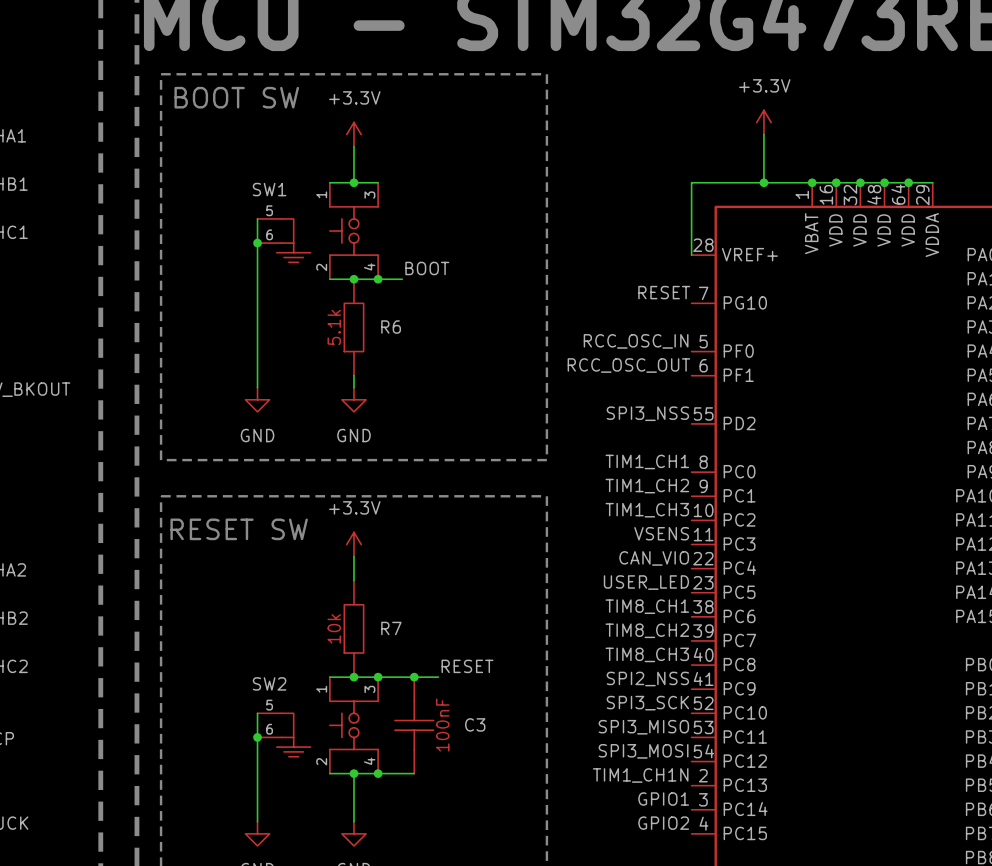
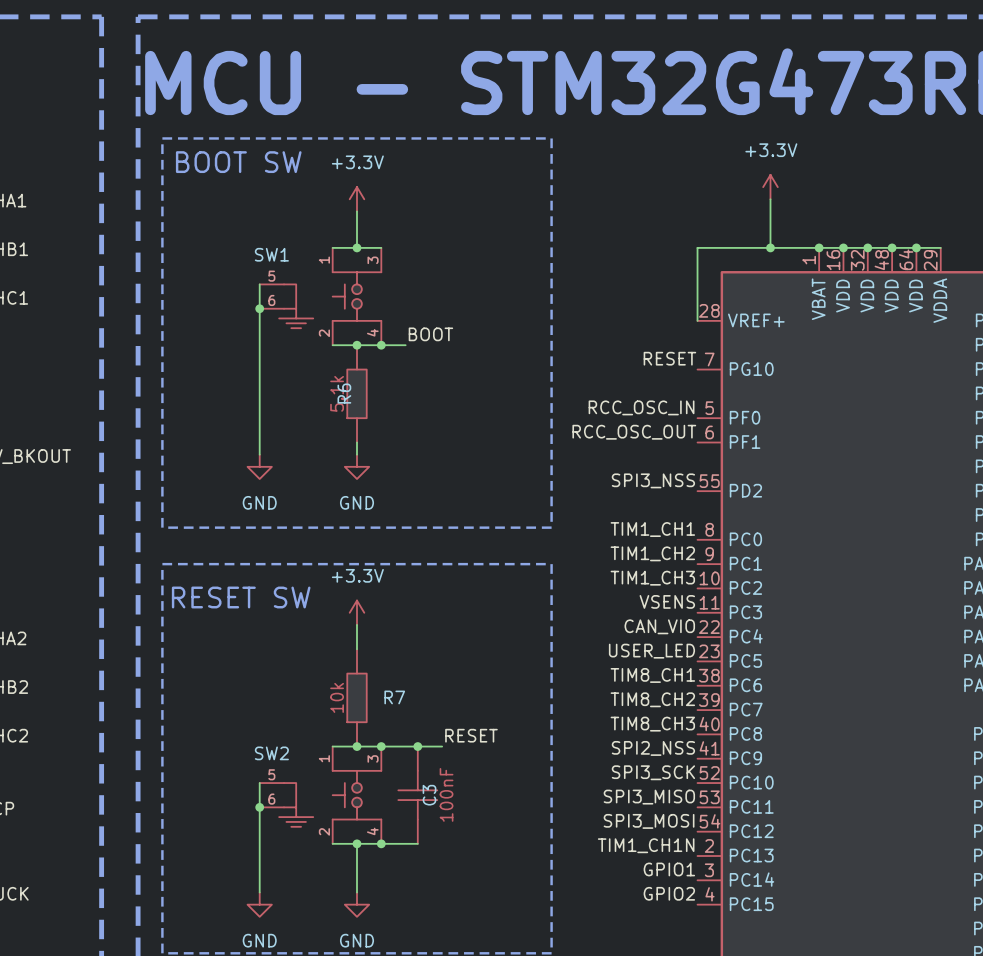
R6 name rotation: 0° (391, 327) -> 90° counterclockwise (344, 393)
R6 name position: R6 (391, 327) -> R6 (344, 393)
C3 name rotation: 0° (475, 724) -> 90° counterclockwise (429, 795)
C3 name position: C3 (475, 724) -> C3 (429, 795)

